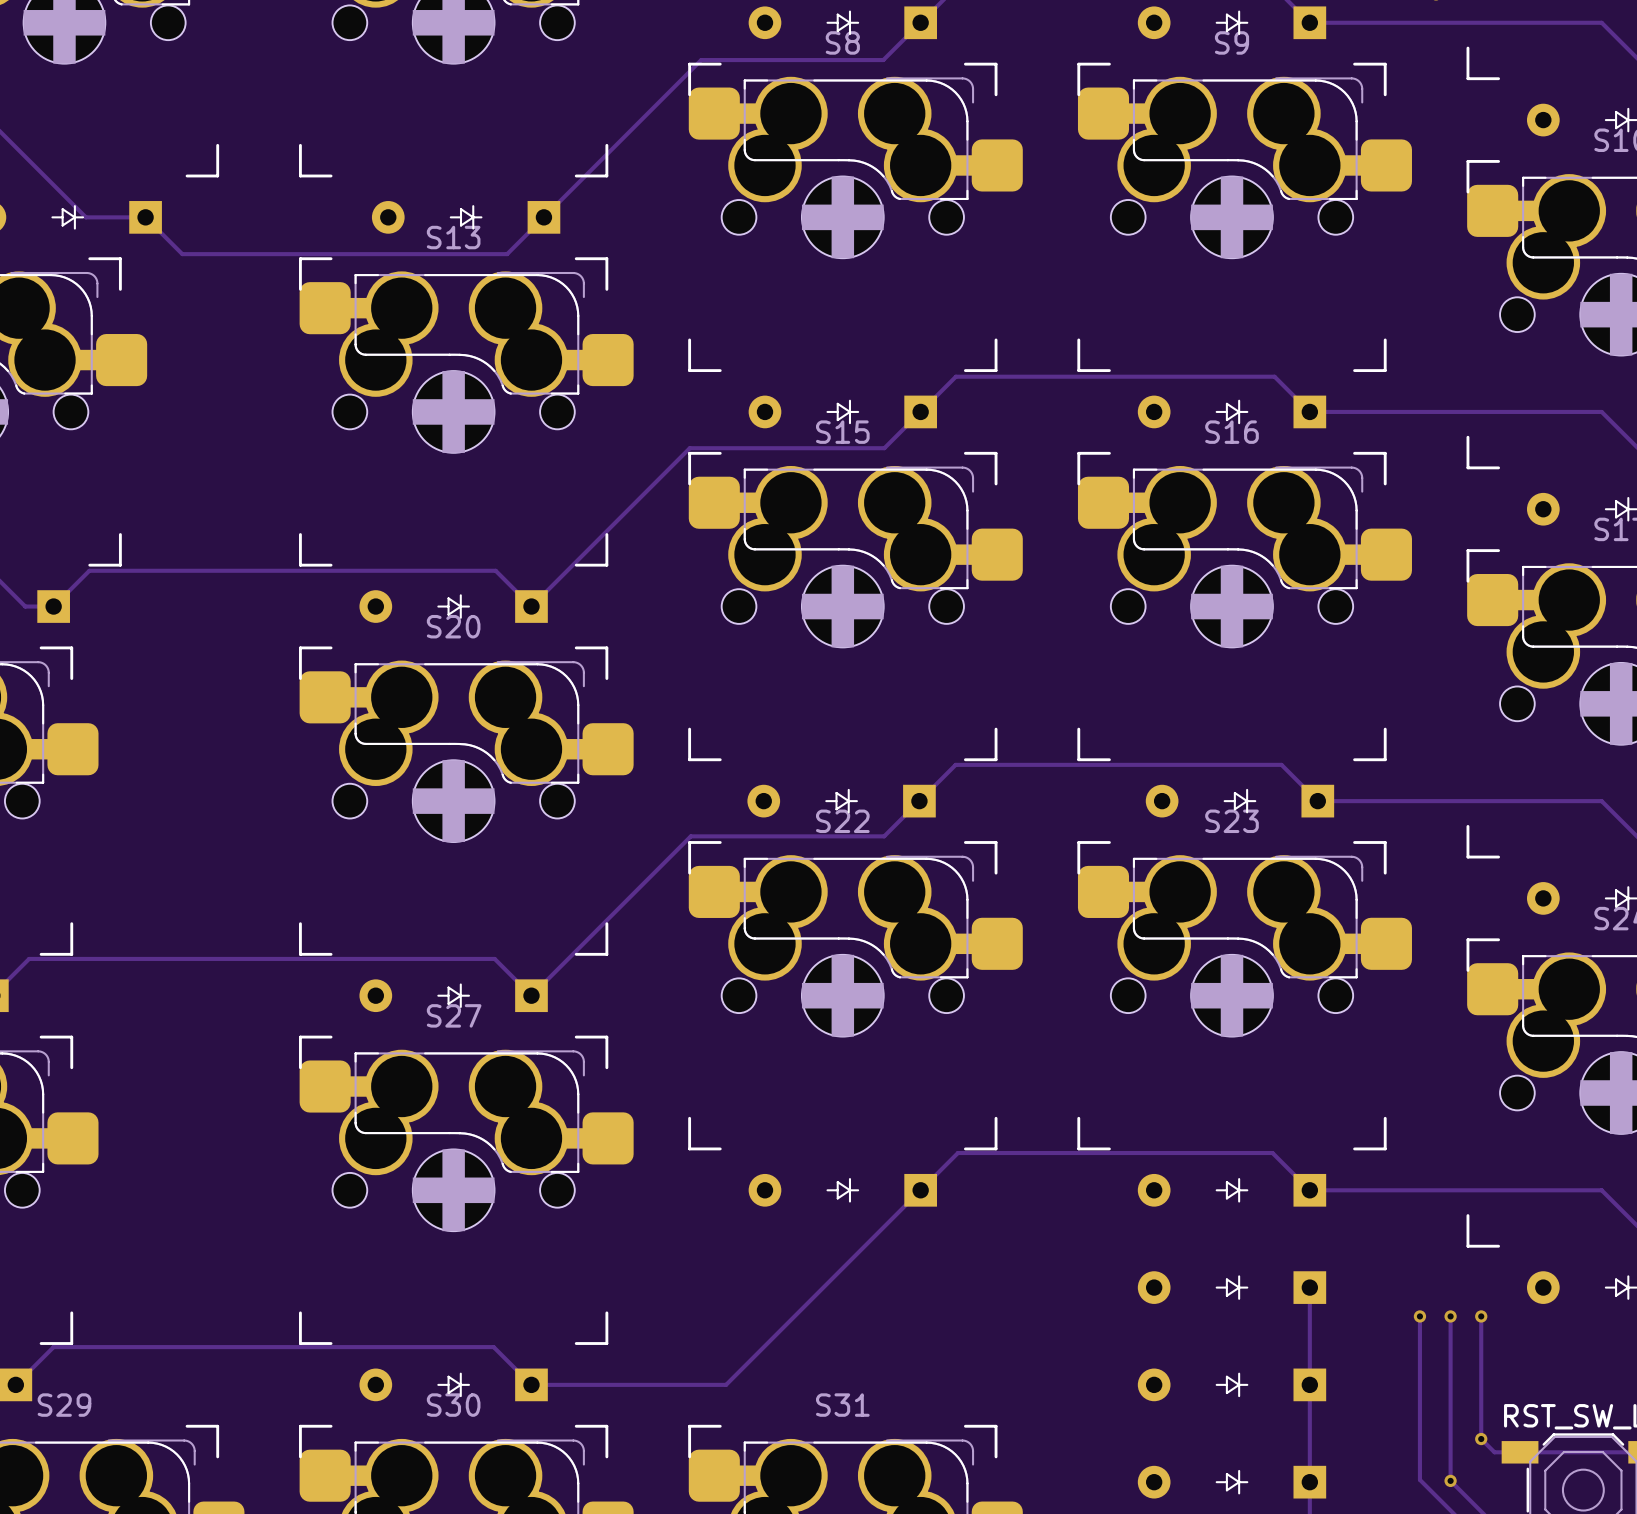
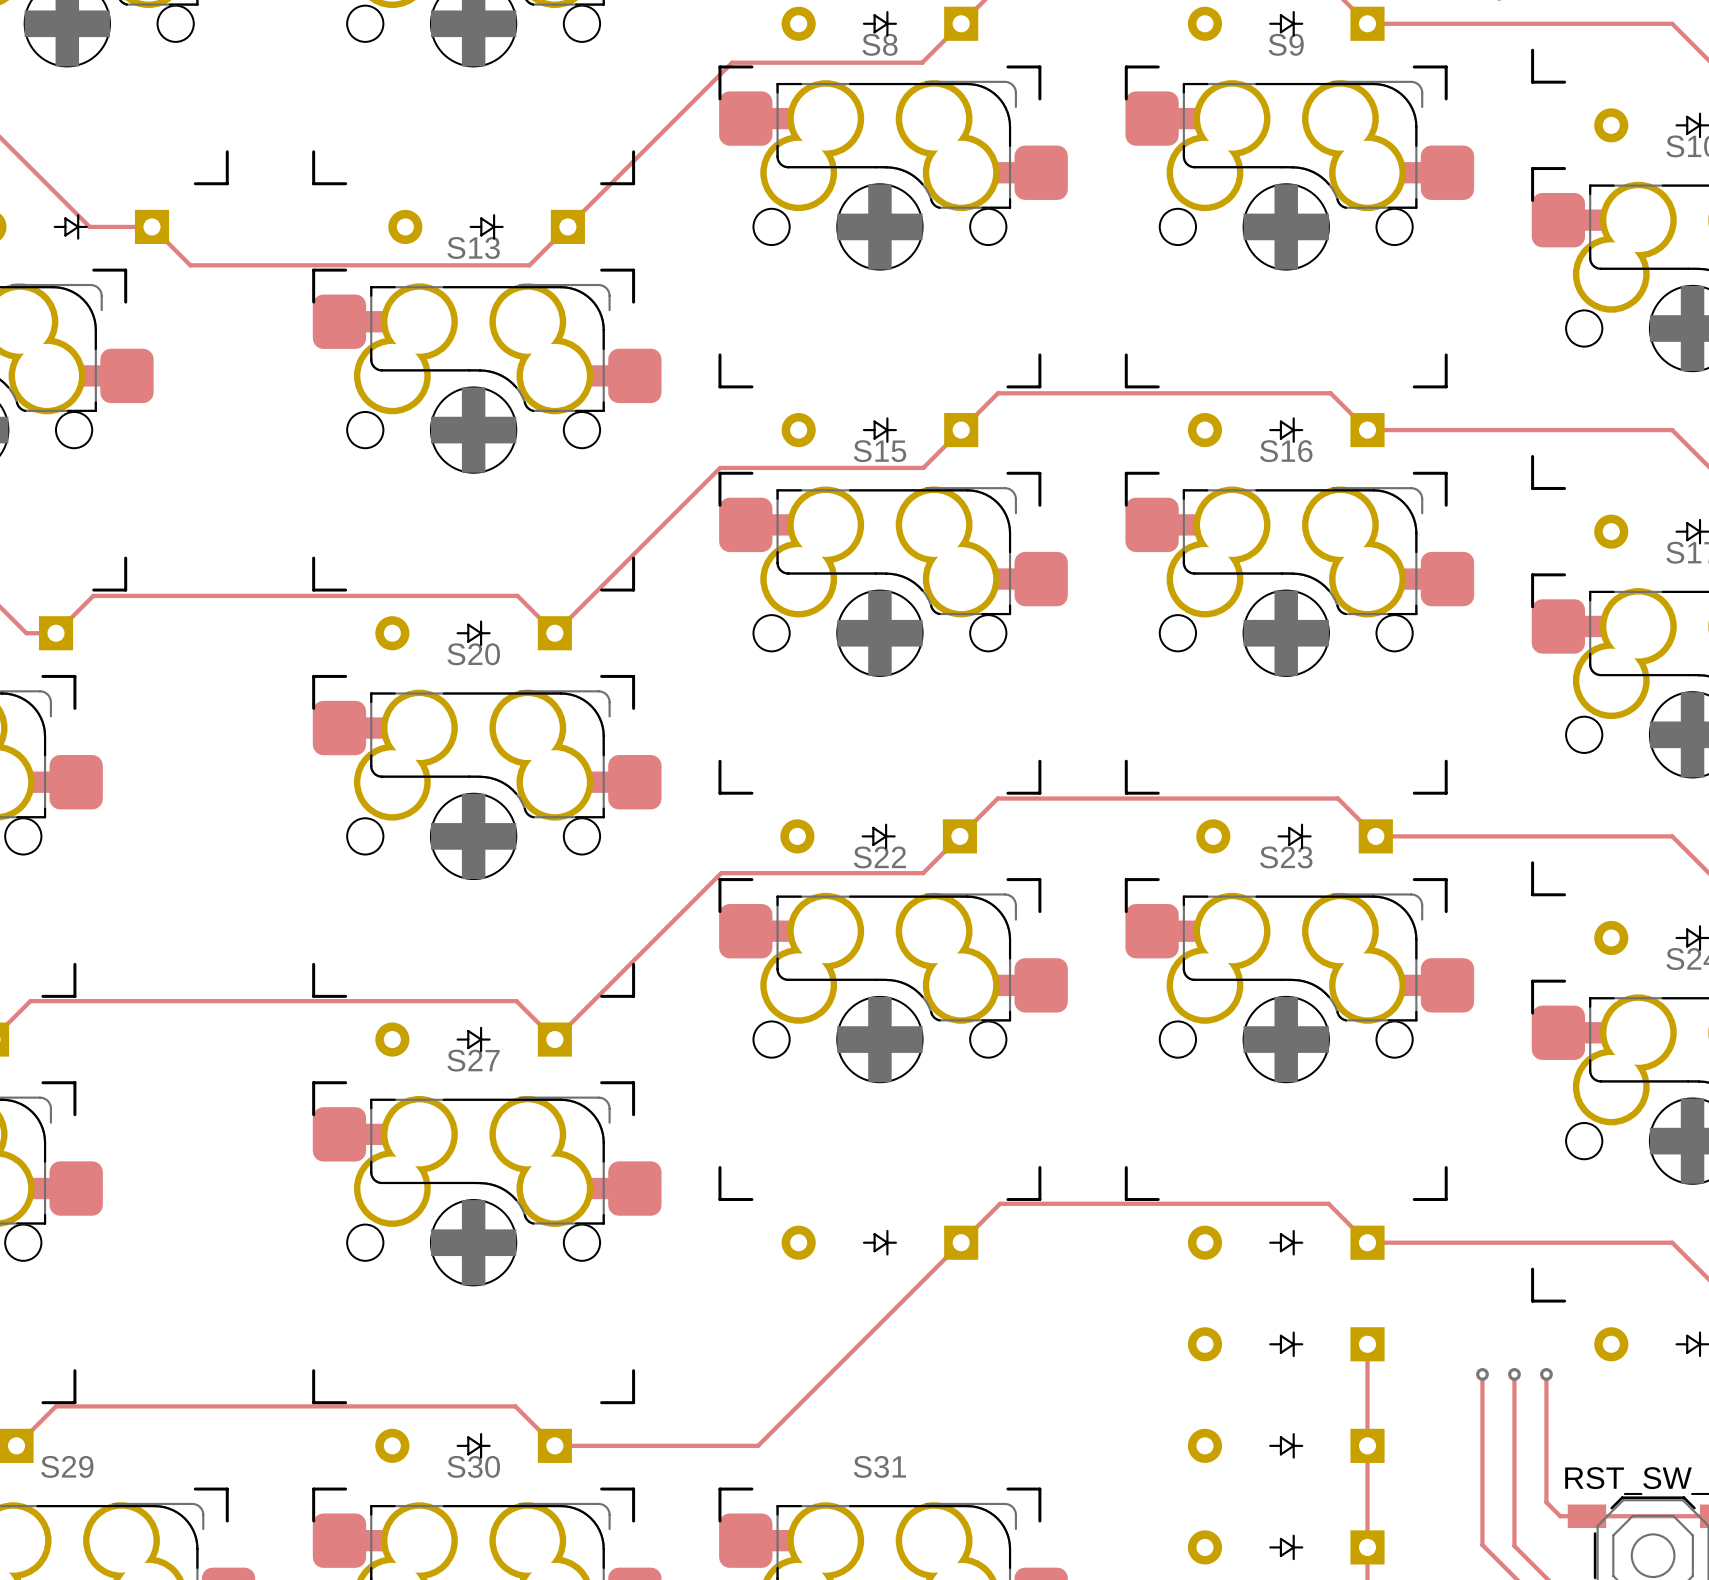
via: (1481, 1439) -> none
via: (1450, 1480) -> none

